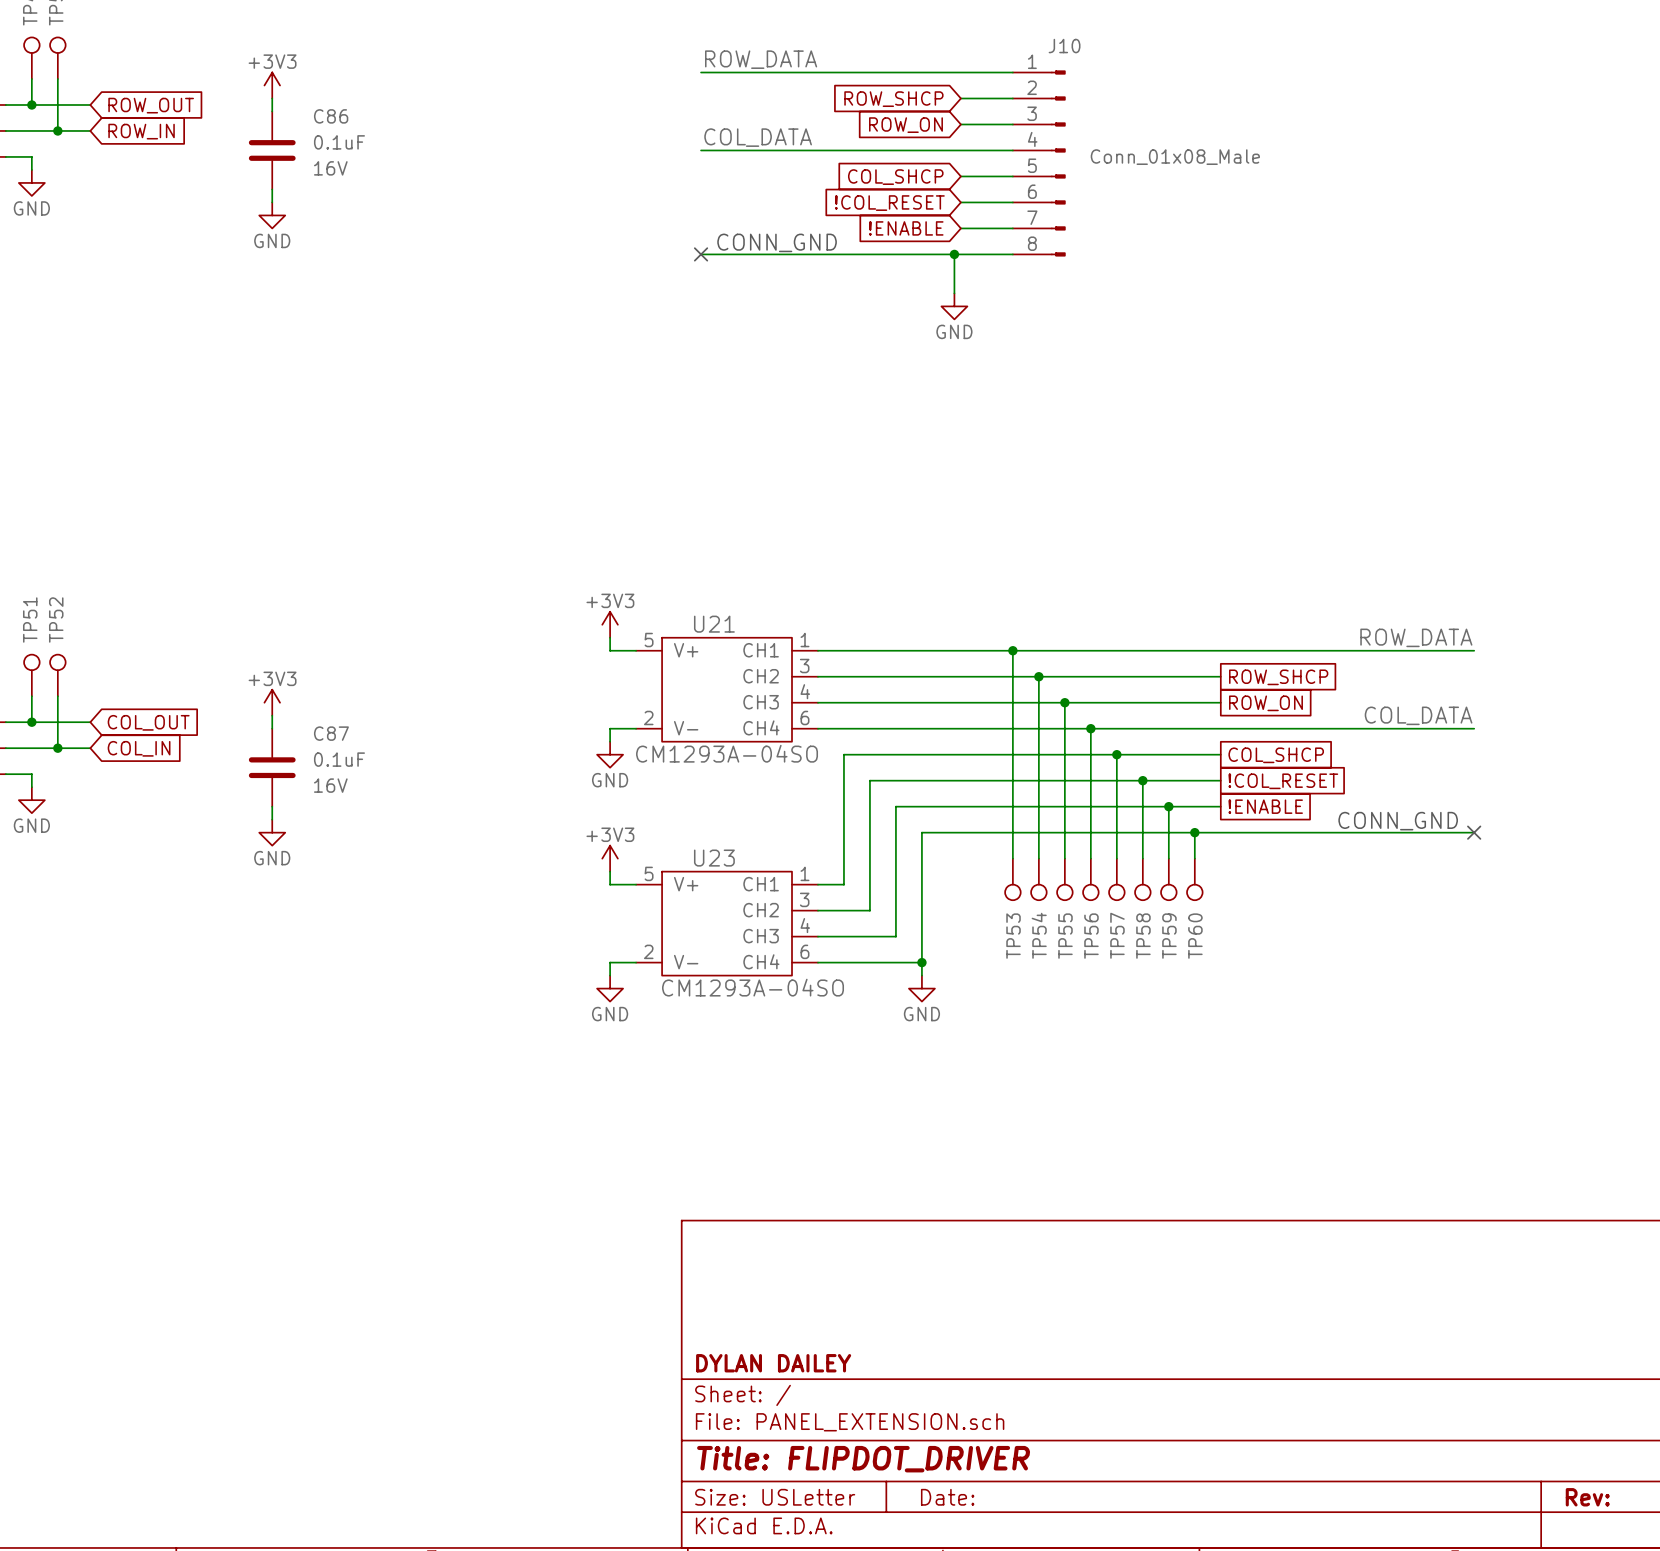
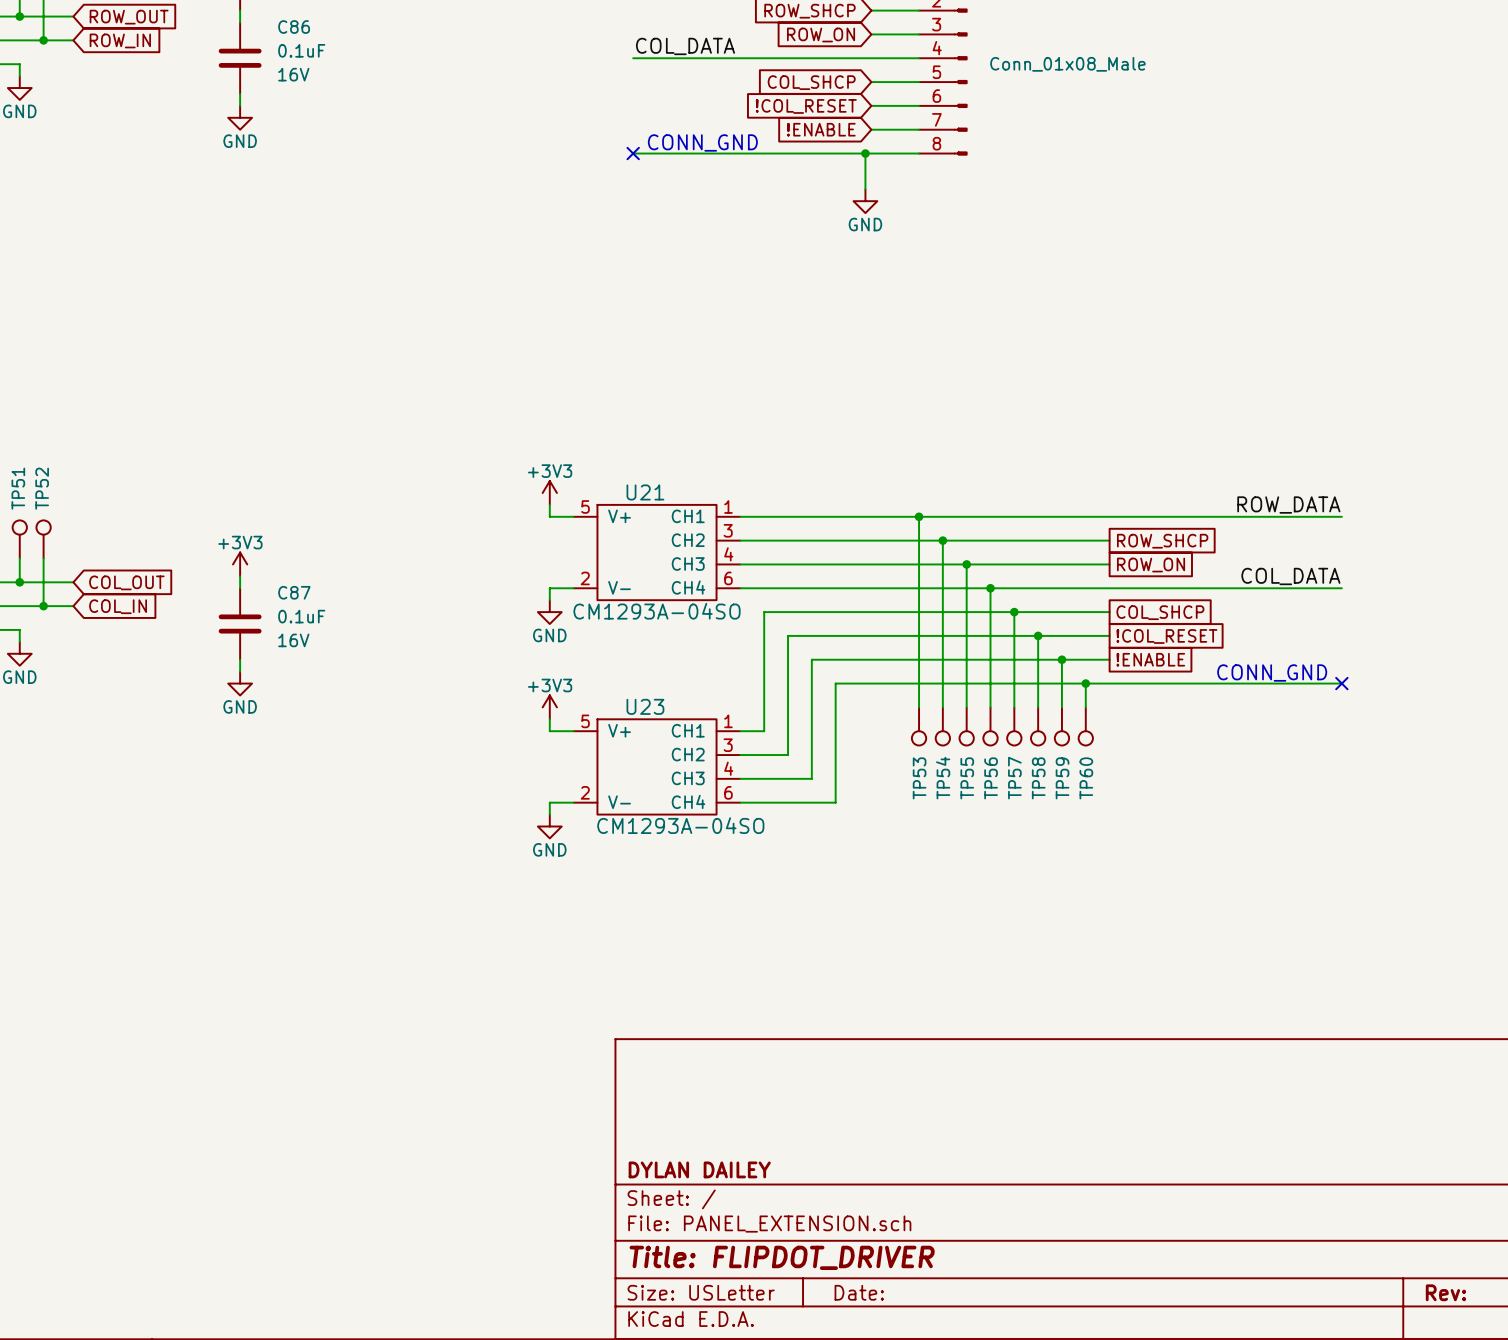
wire: (921, 962) (921, 975) -> none
junction: (921, 962) -> none
power symbol: GND (921, 988) -> none

